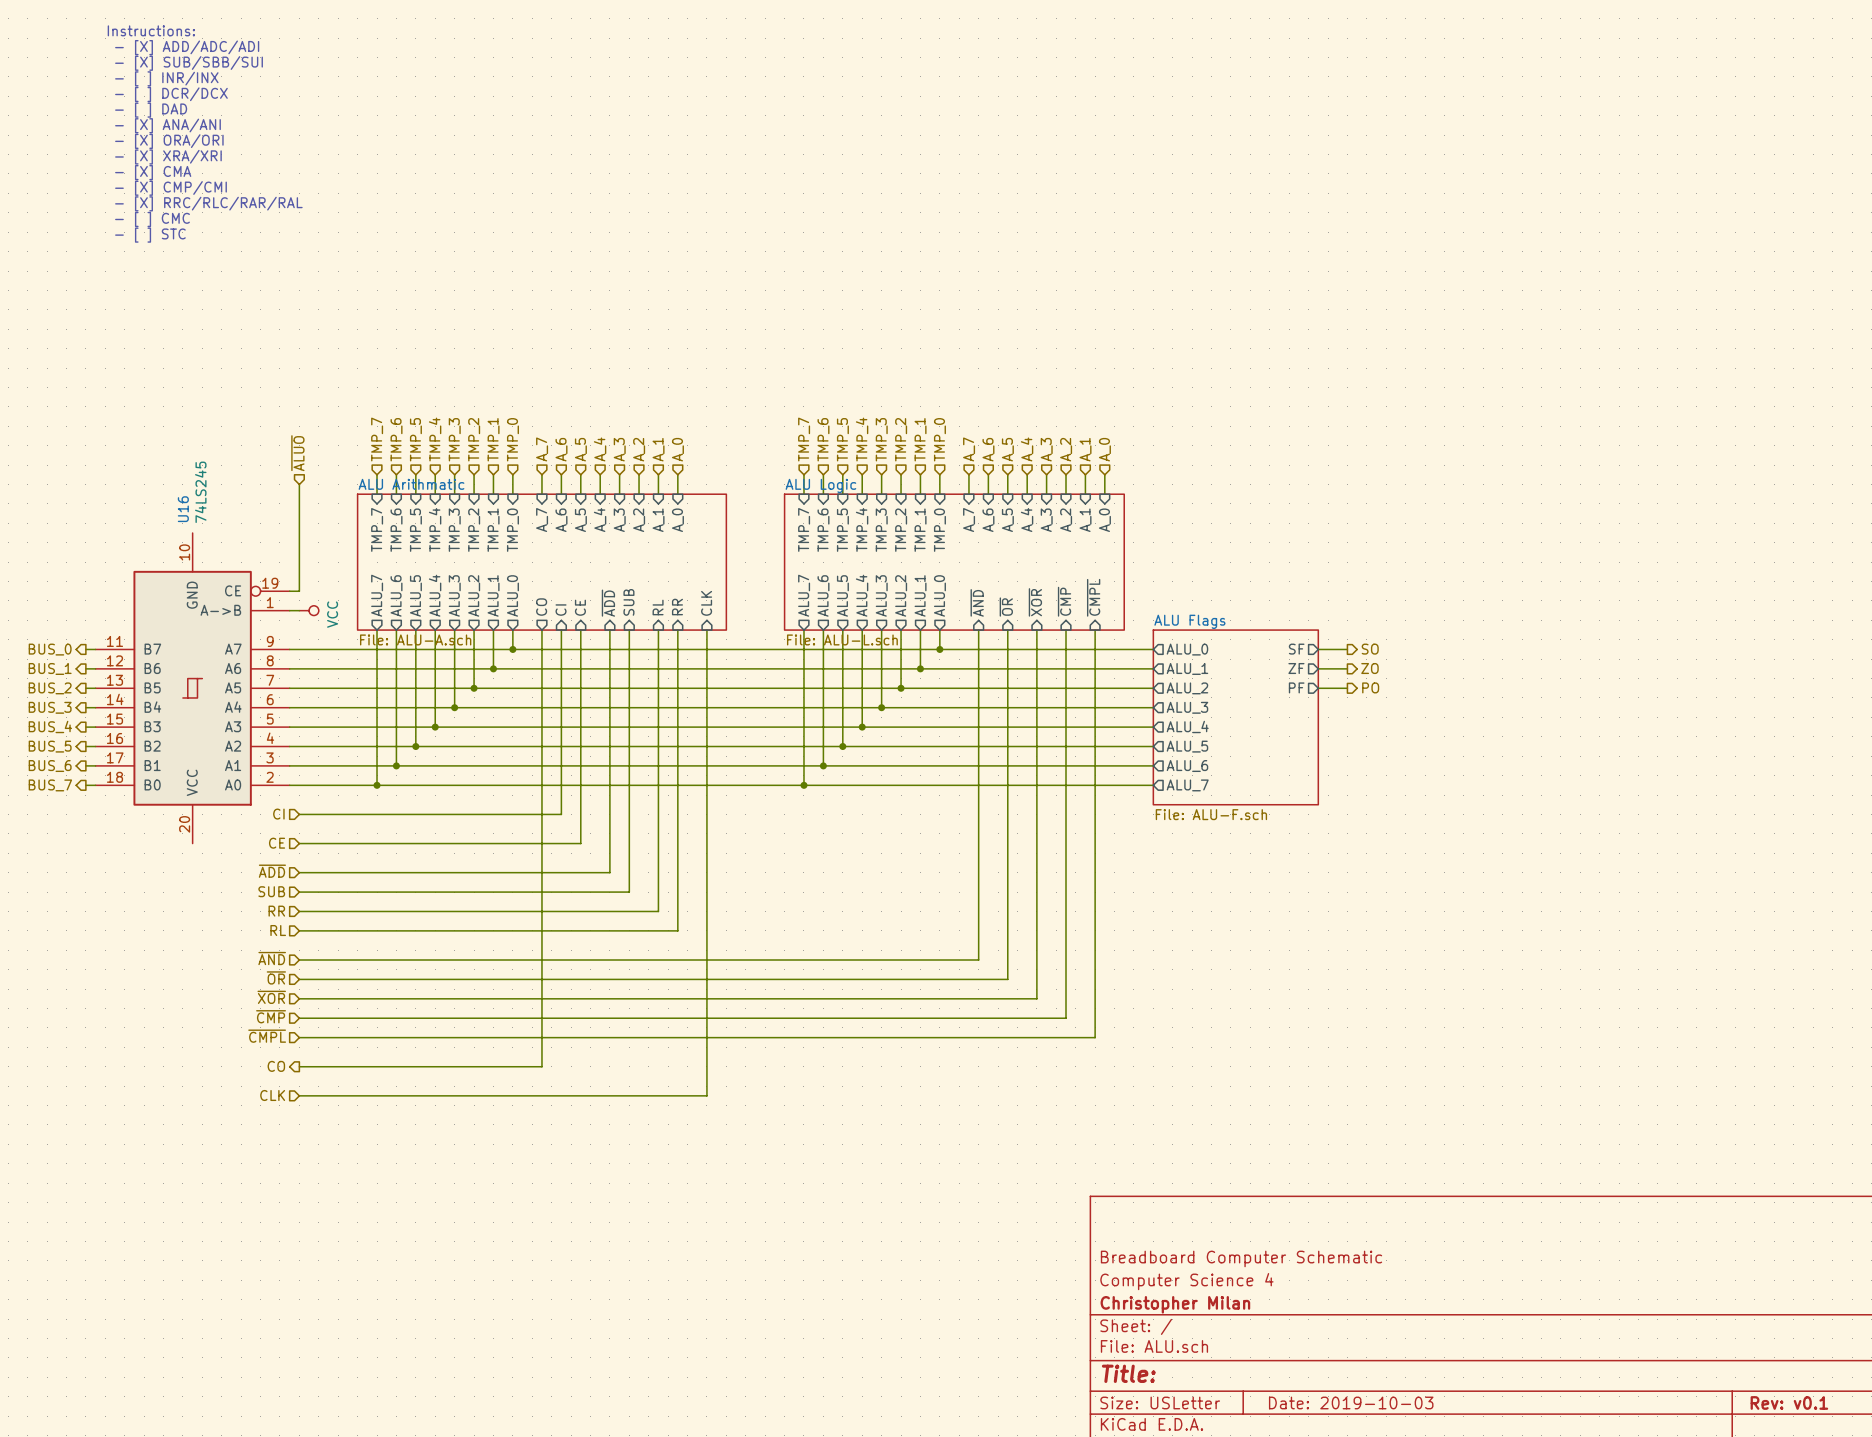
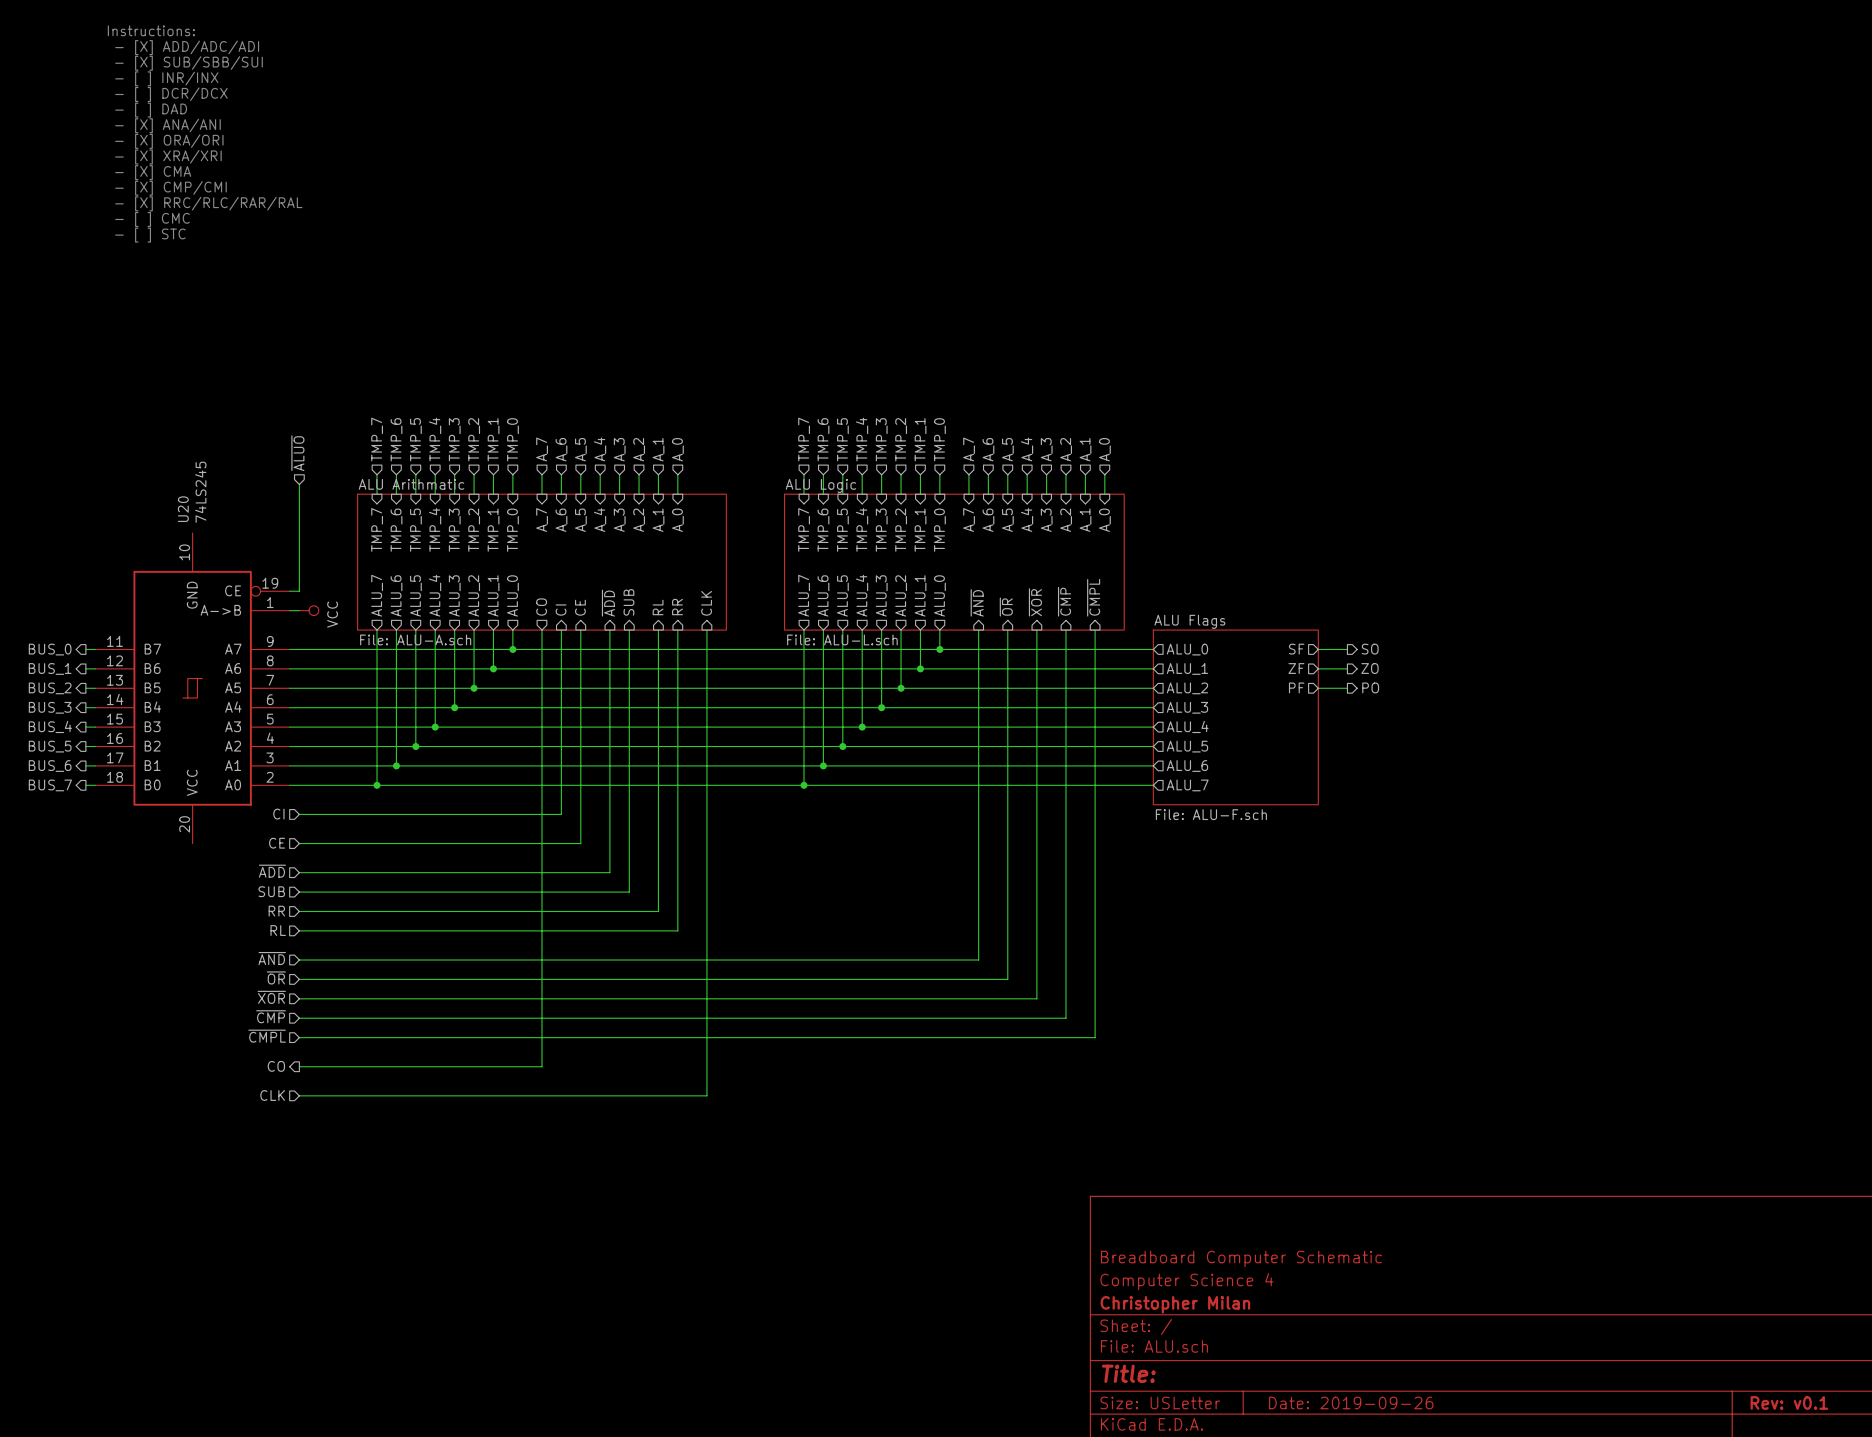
U16 name: U16 (183, 509) -> U20 (183, 509)
title block: Date: 2019-10-03 (1351, 1402) -> Date: 2019-09-26 (1351, 1402)

